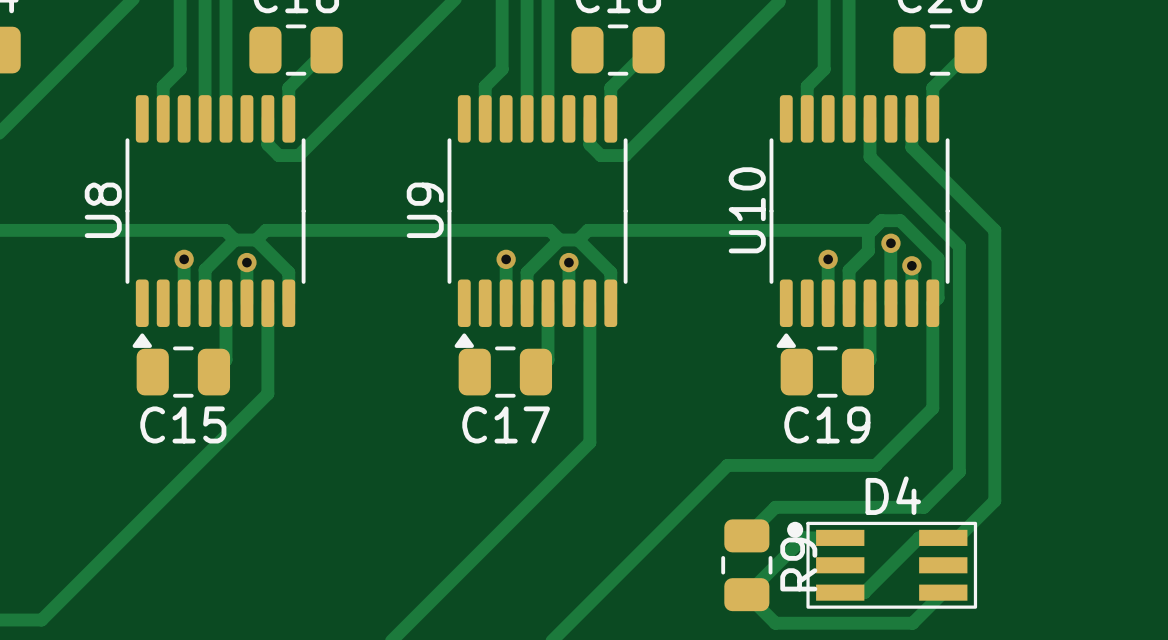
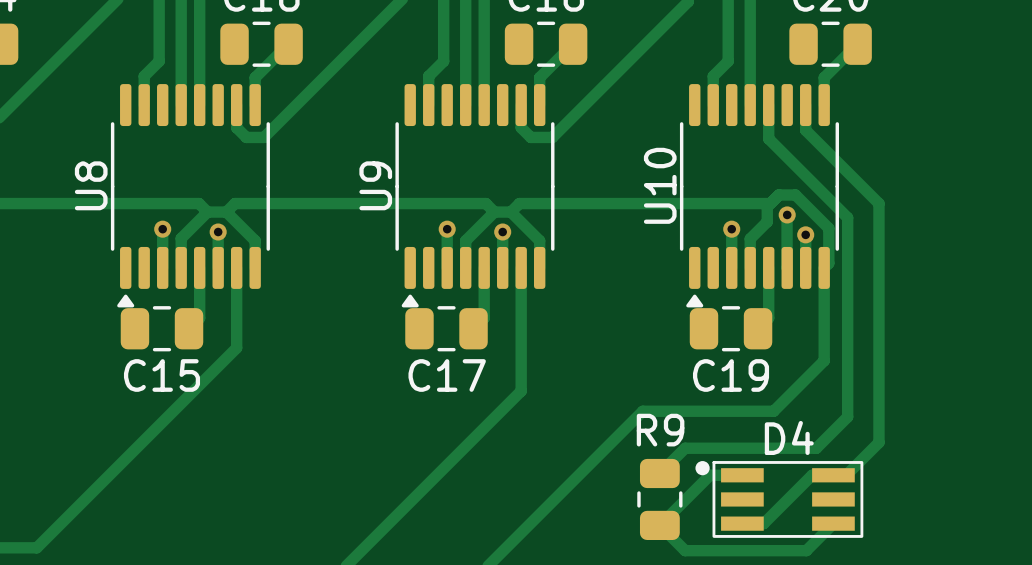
R9 name rotation: 0° (798, 564) -> 90° clockwise (660, 430)
R9 name position: R9 (798, 564) -> R9 (660, 430)

